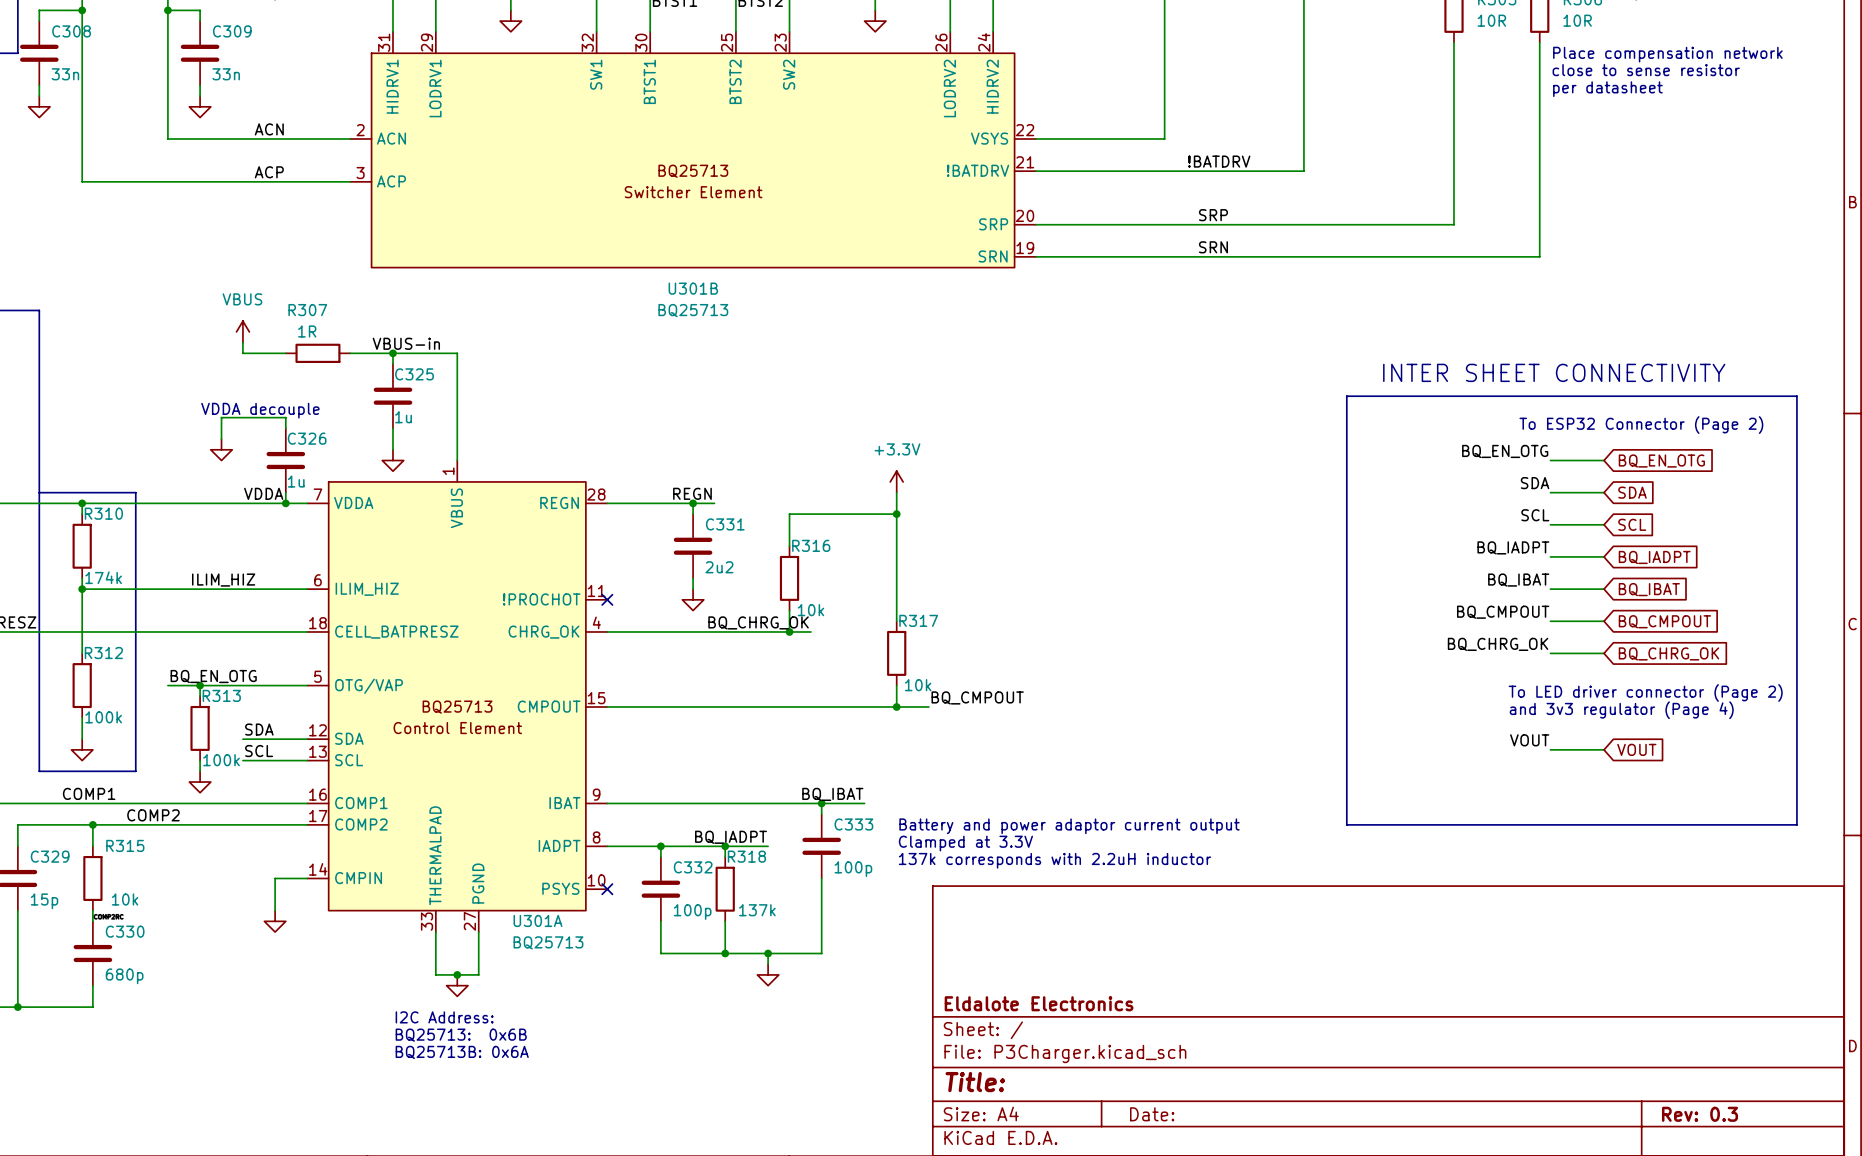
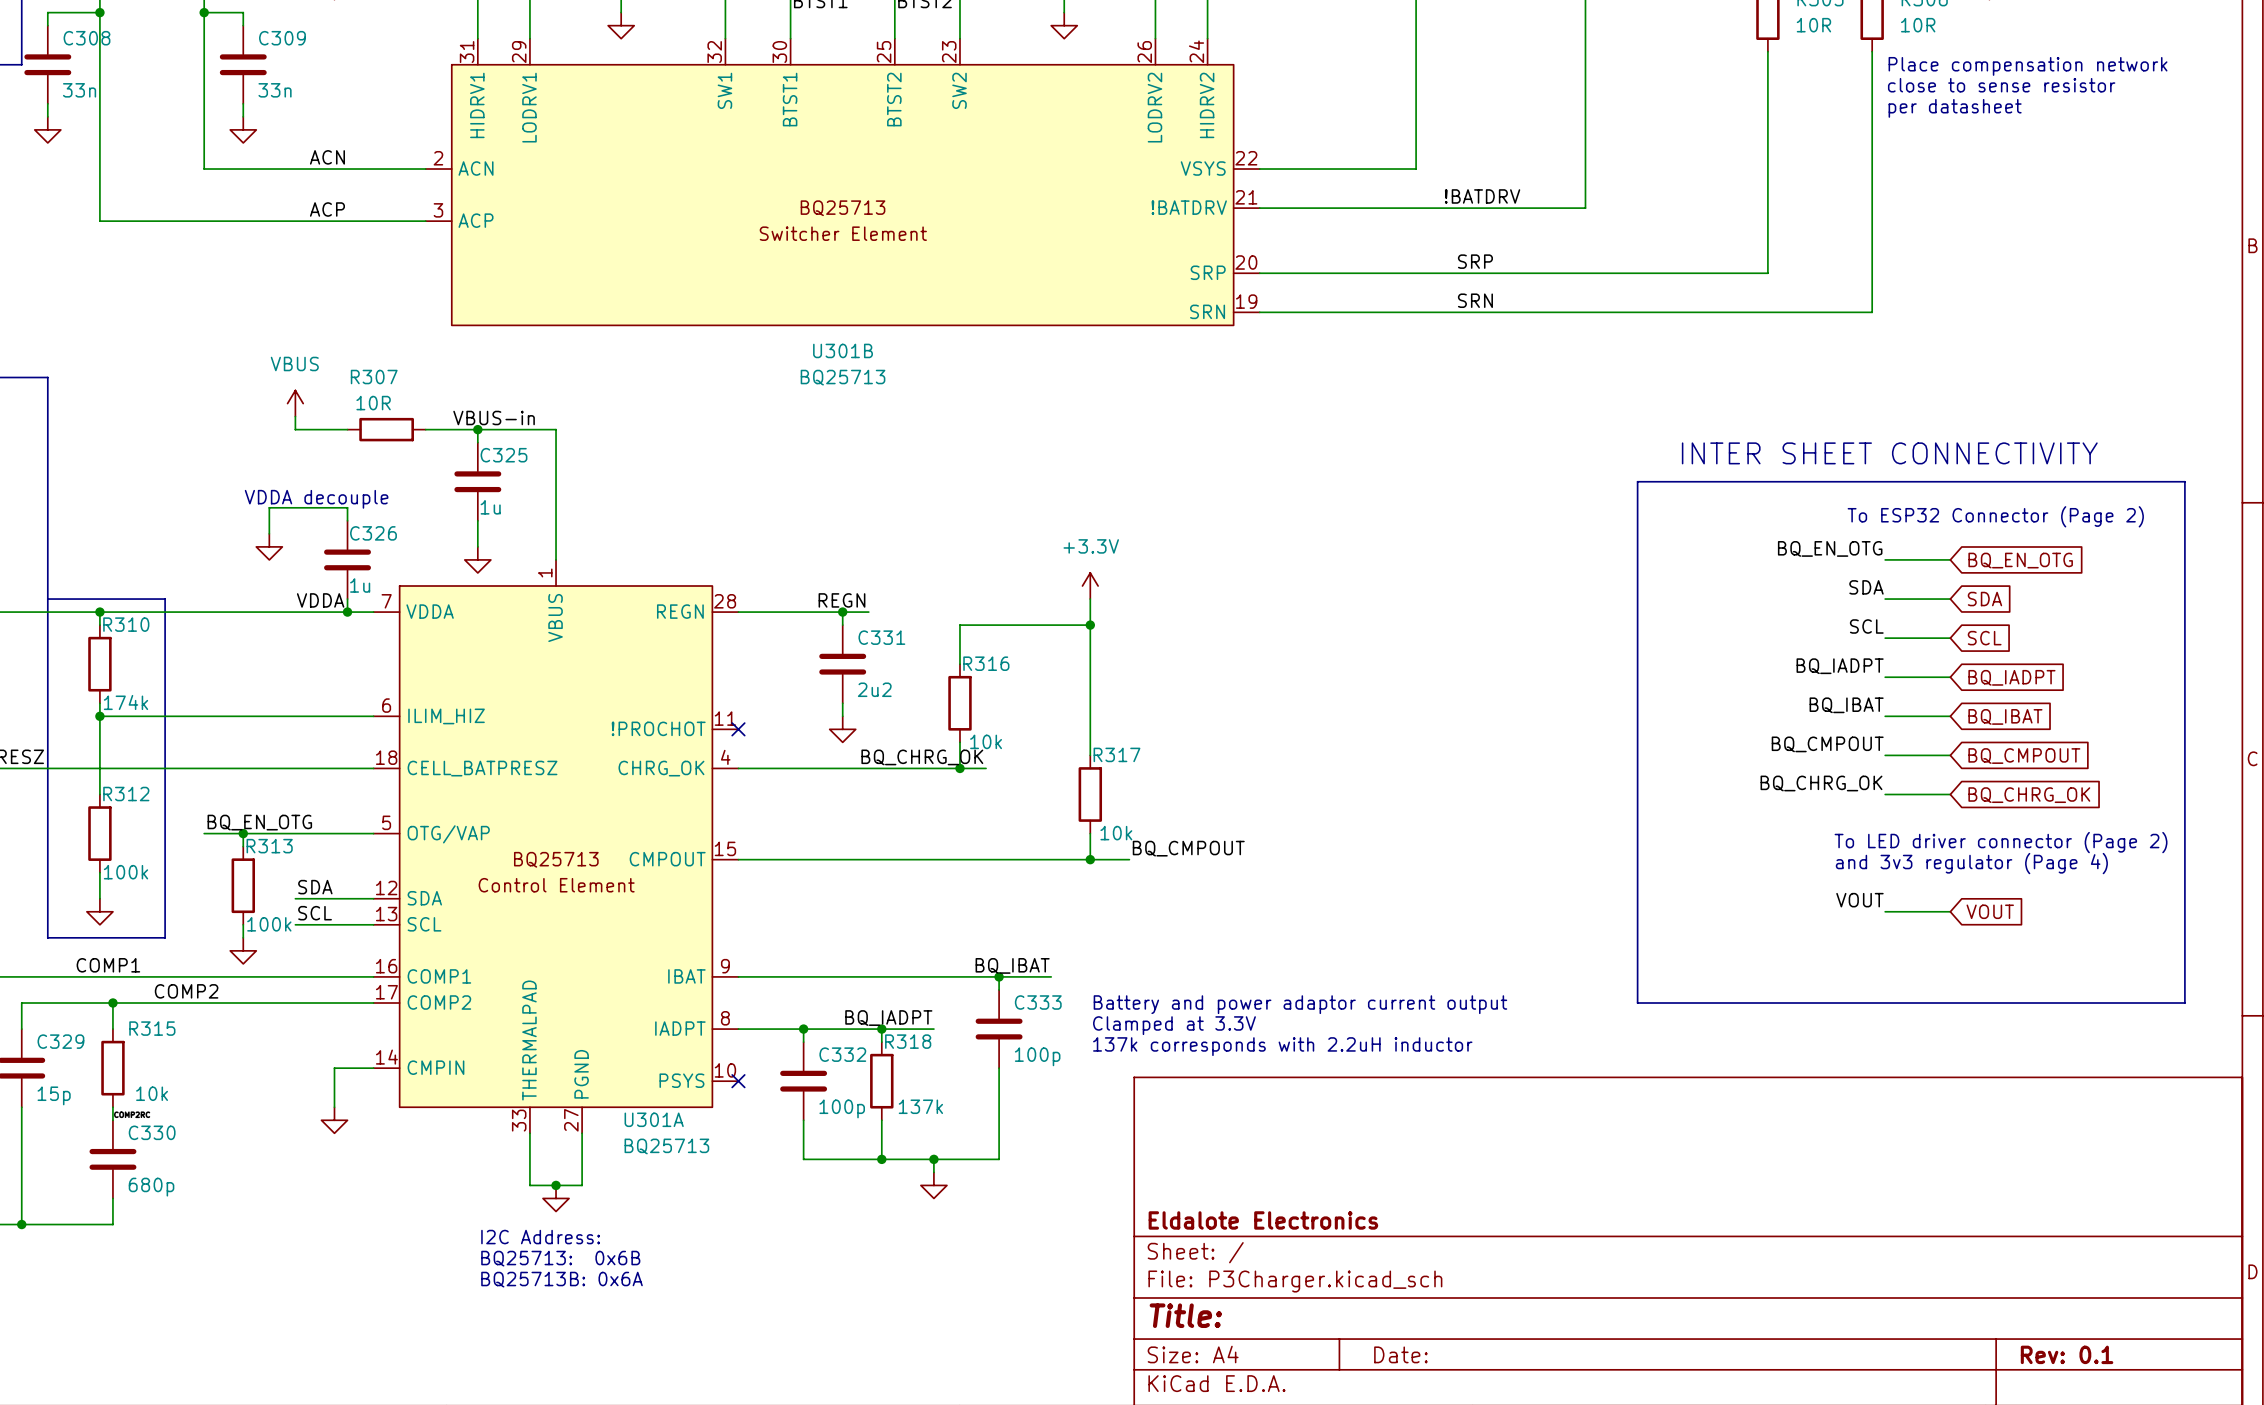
R307 value: 1R (307, 331) -> 10R (373, 403)
label: ILIM_HIZ (223, 580) -> none
title block: Rev: 0.3 (1699, 1114) -> Rev: 0.1 (2067, 1354)

